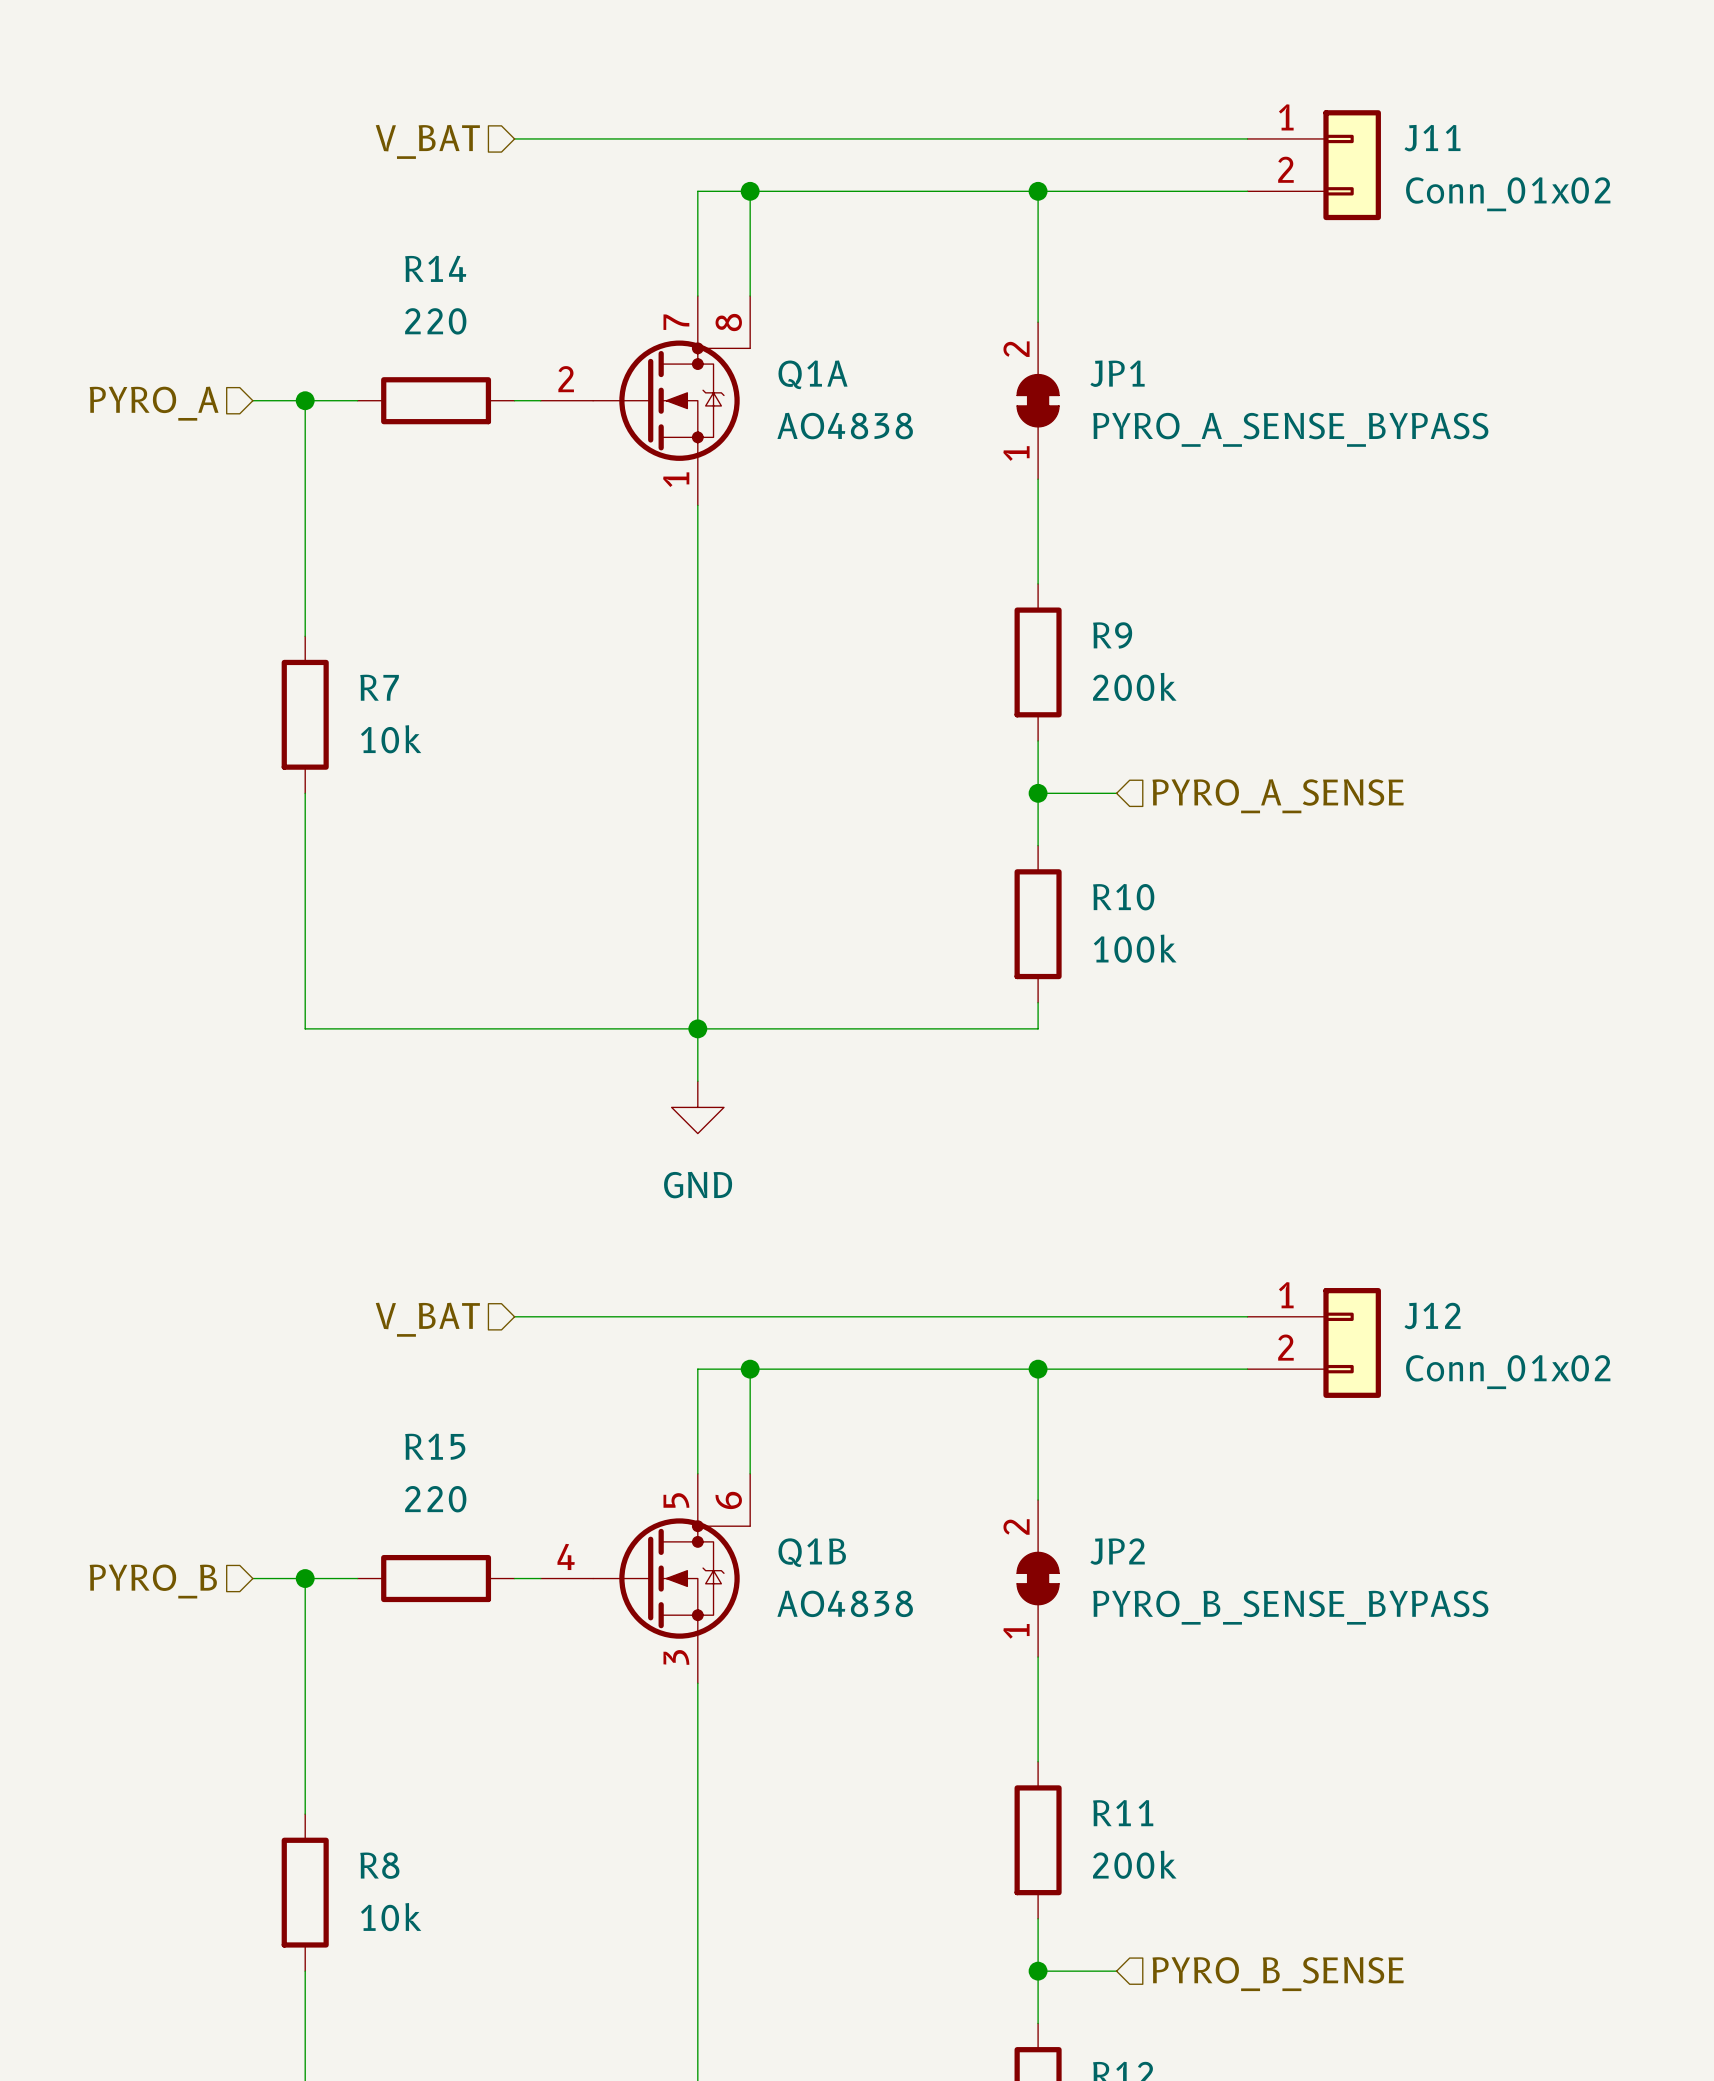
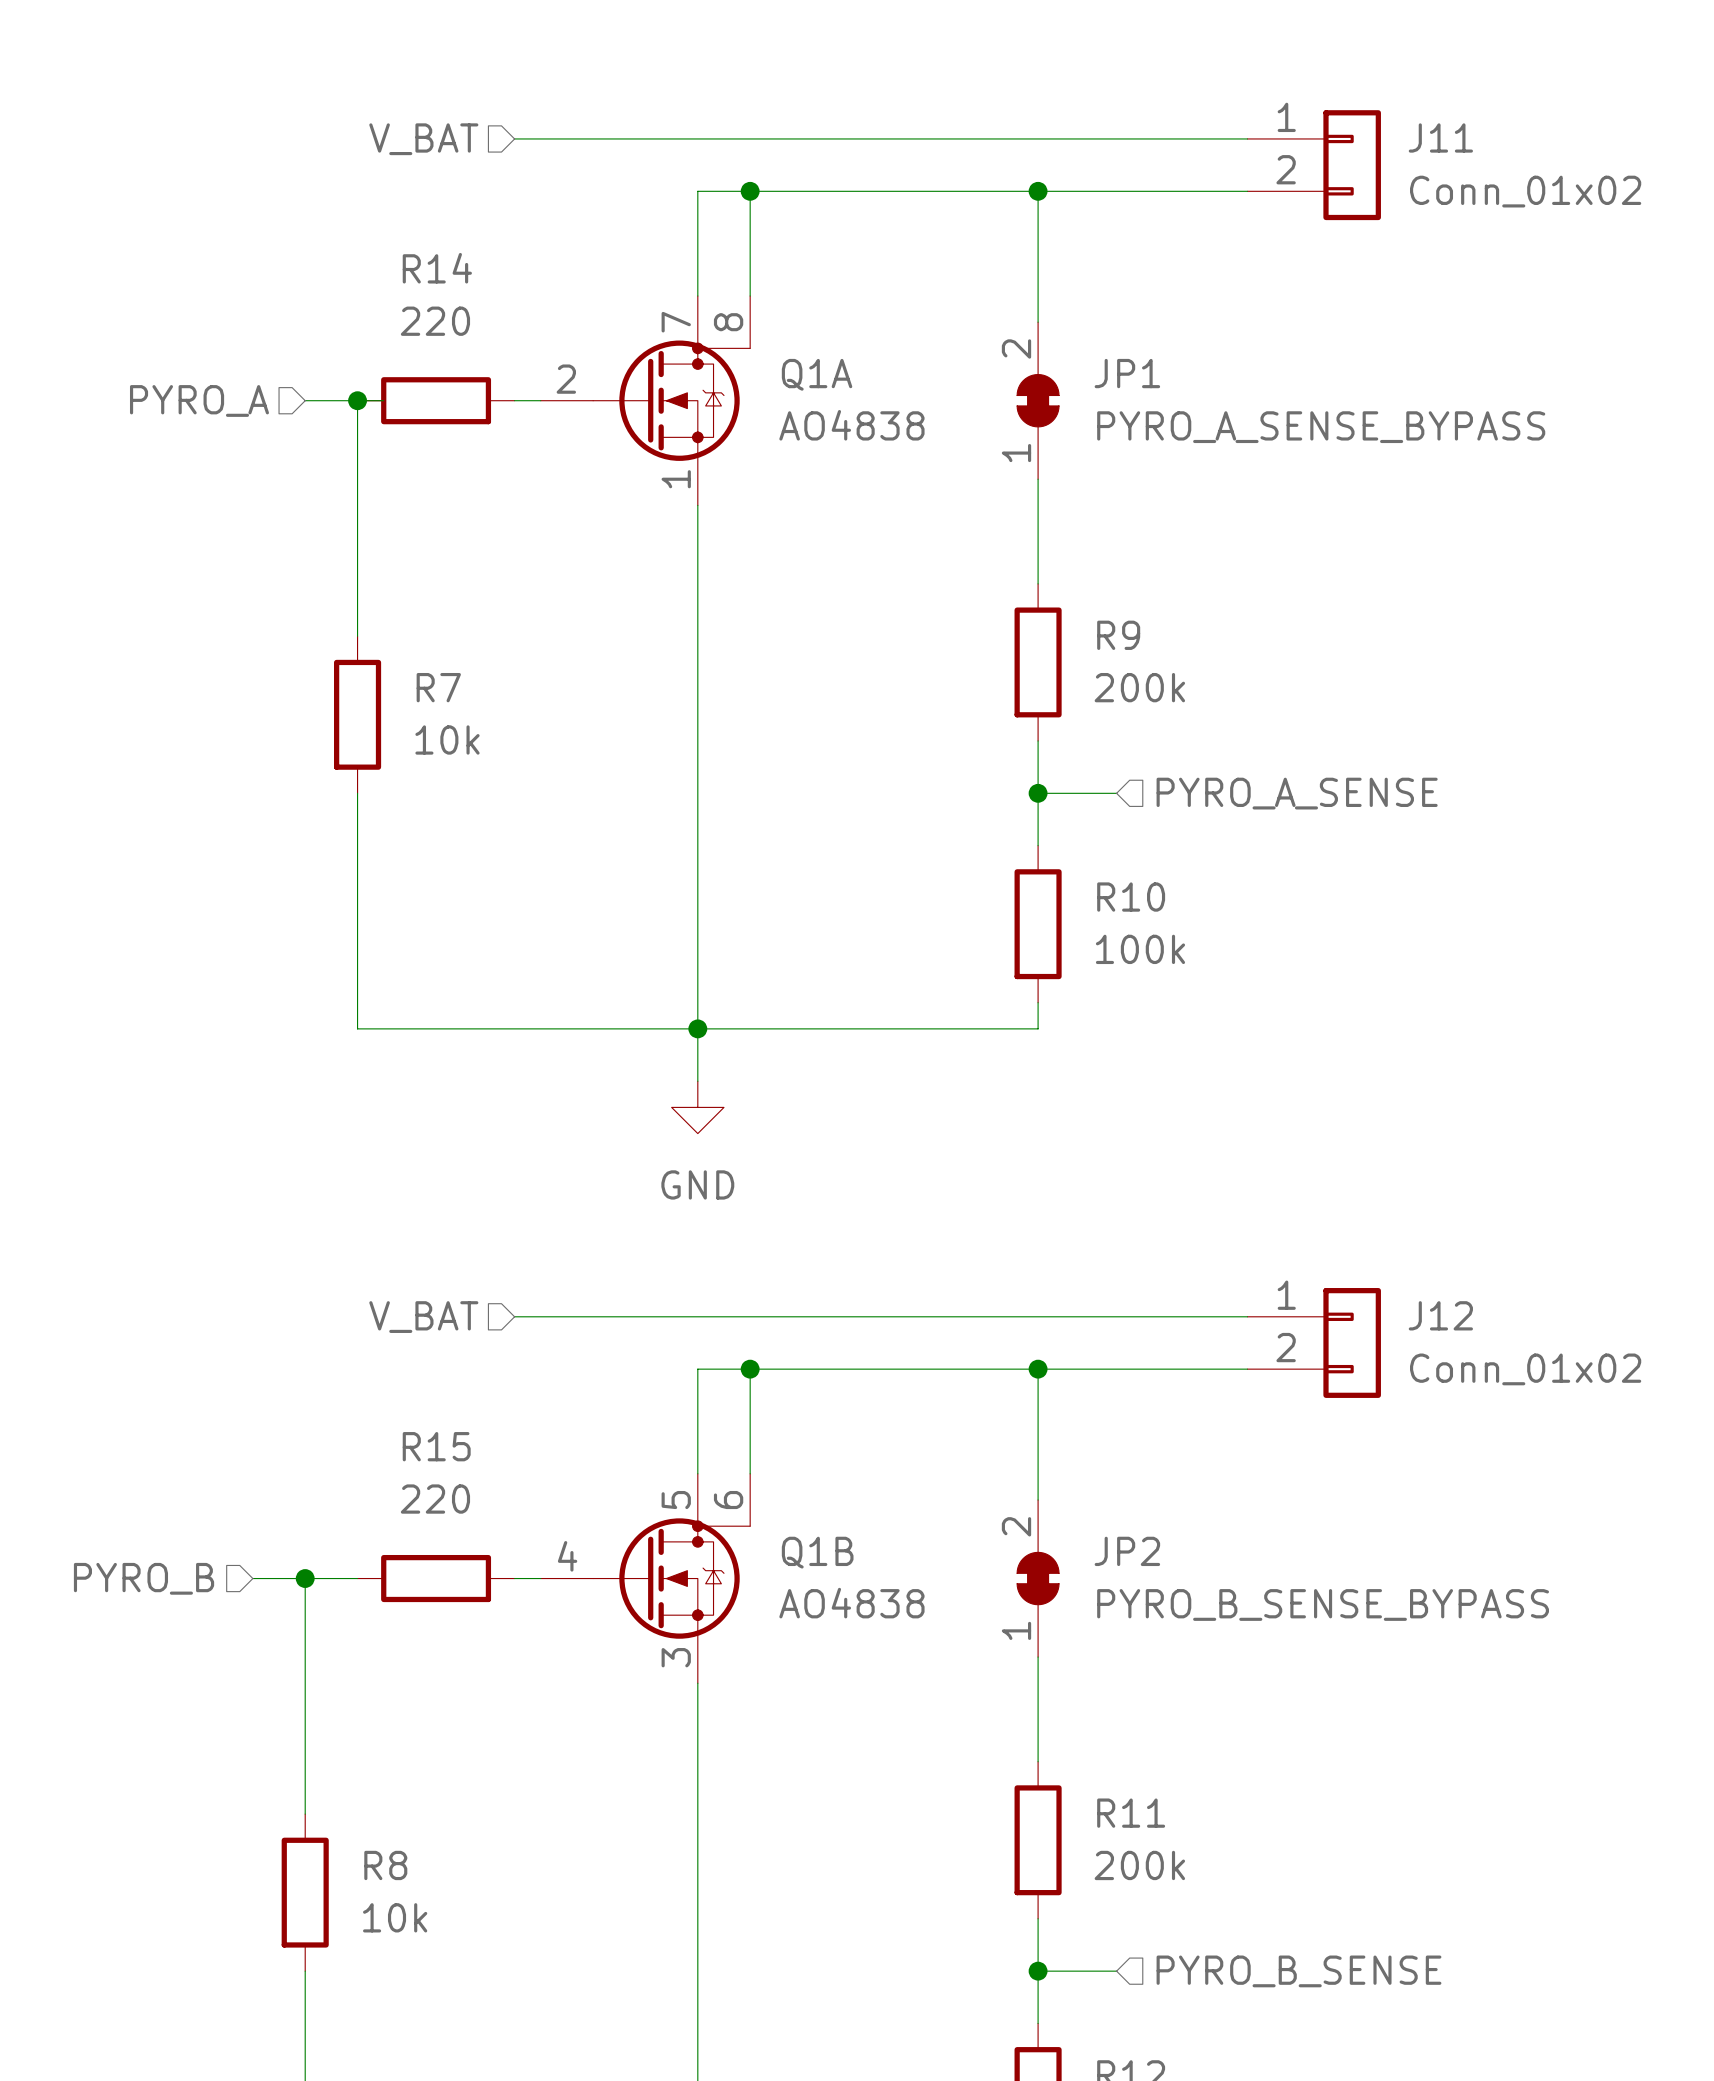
wire: (252, 400) (305, 400) (305, 636) -> none
junction position: (305, 400) -> (357, 400)
wire: none -> (383, 400) (357, 400) (357, 636)
hierarchical label position: PYRO_A (154, 403) -> PYRO_A (199, 400)
R7 position: (305, 714) -> (357, 714)
wire: (305, 793) (305, 1028) (357, 1028) -> (357, 793) (357, 1028)

